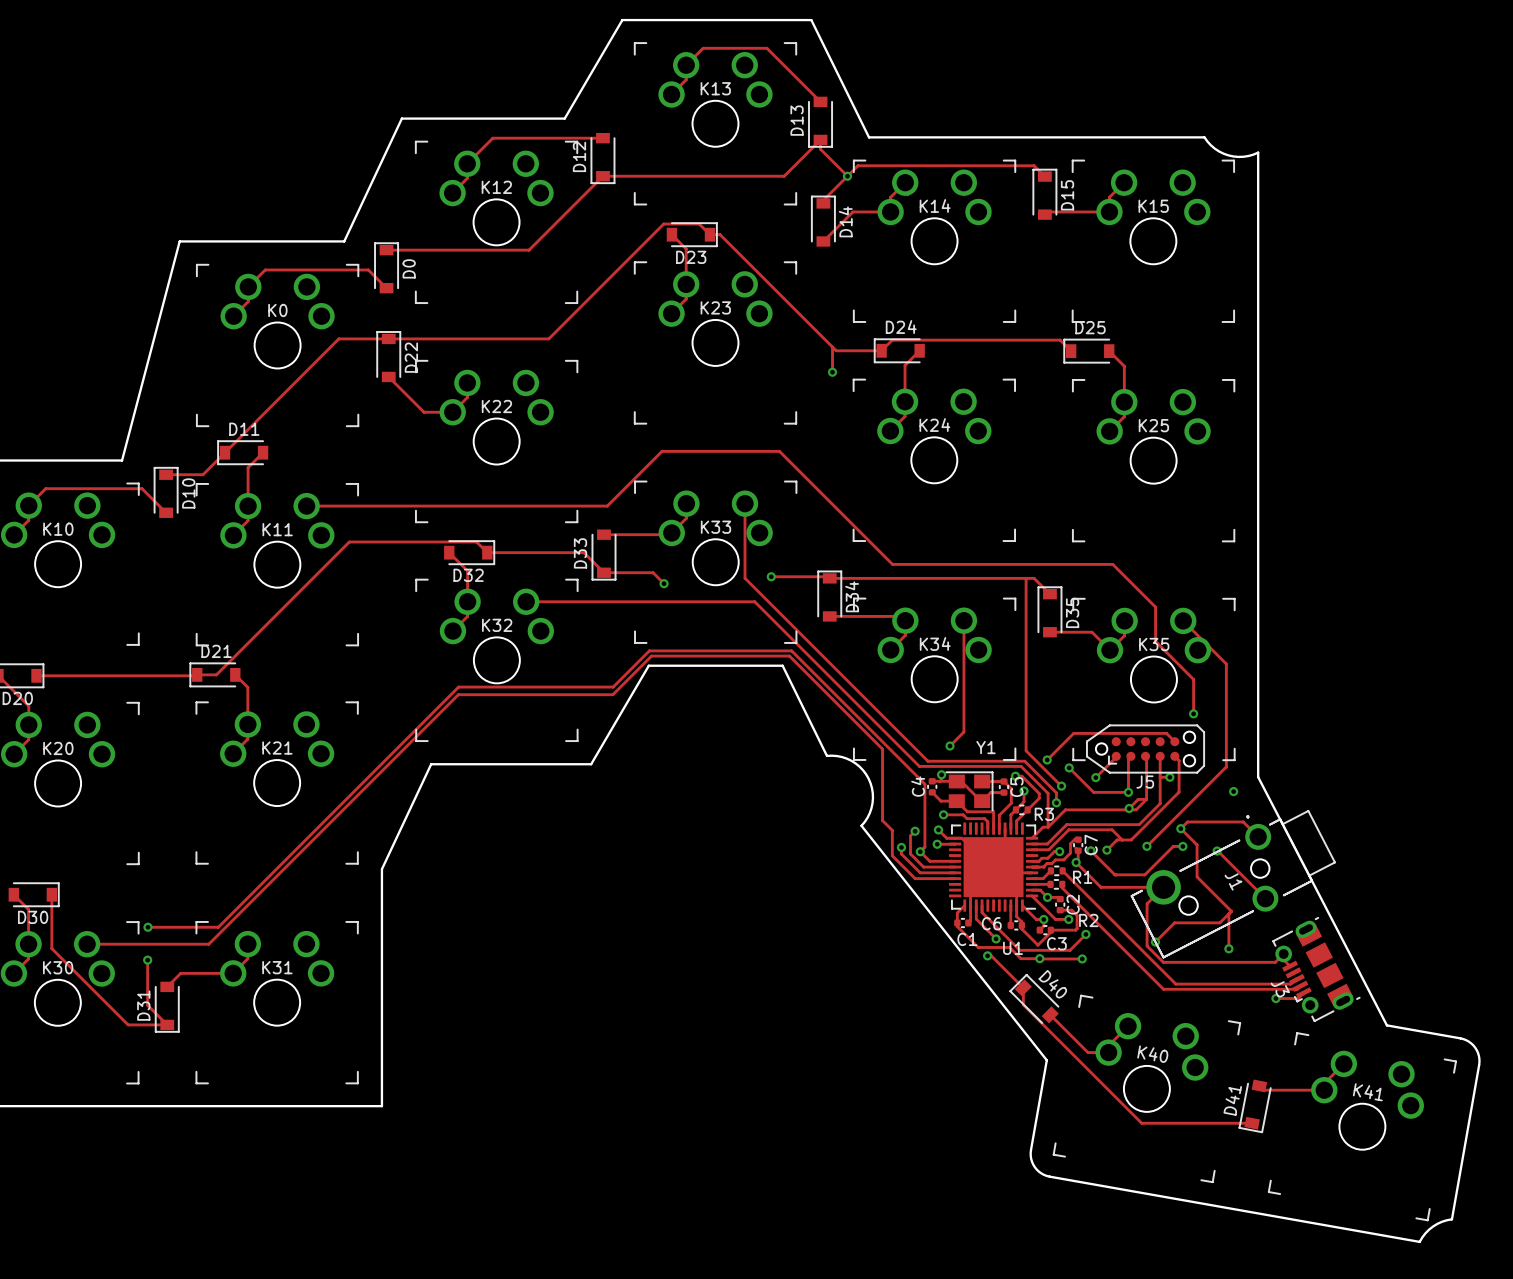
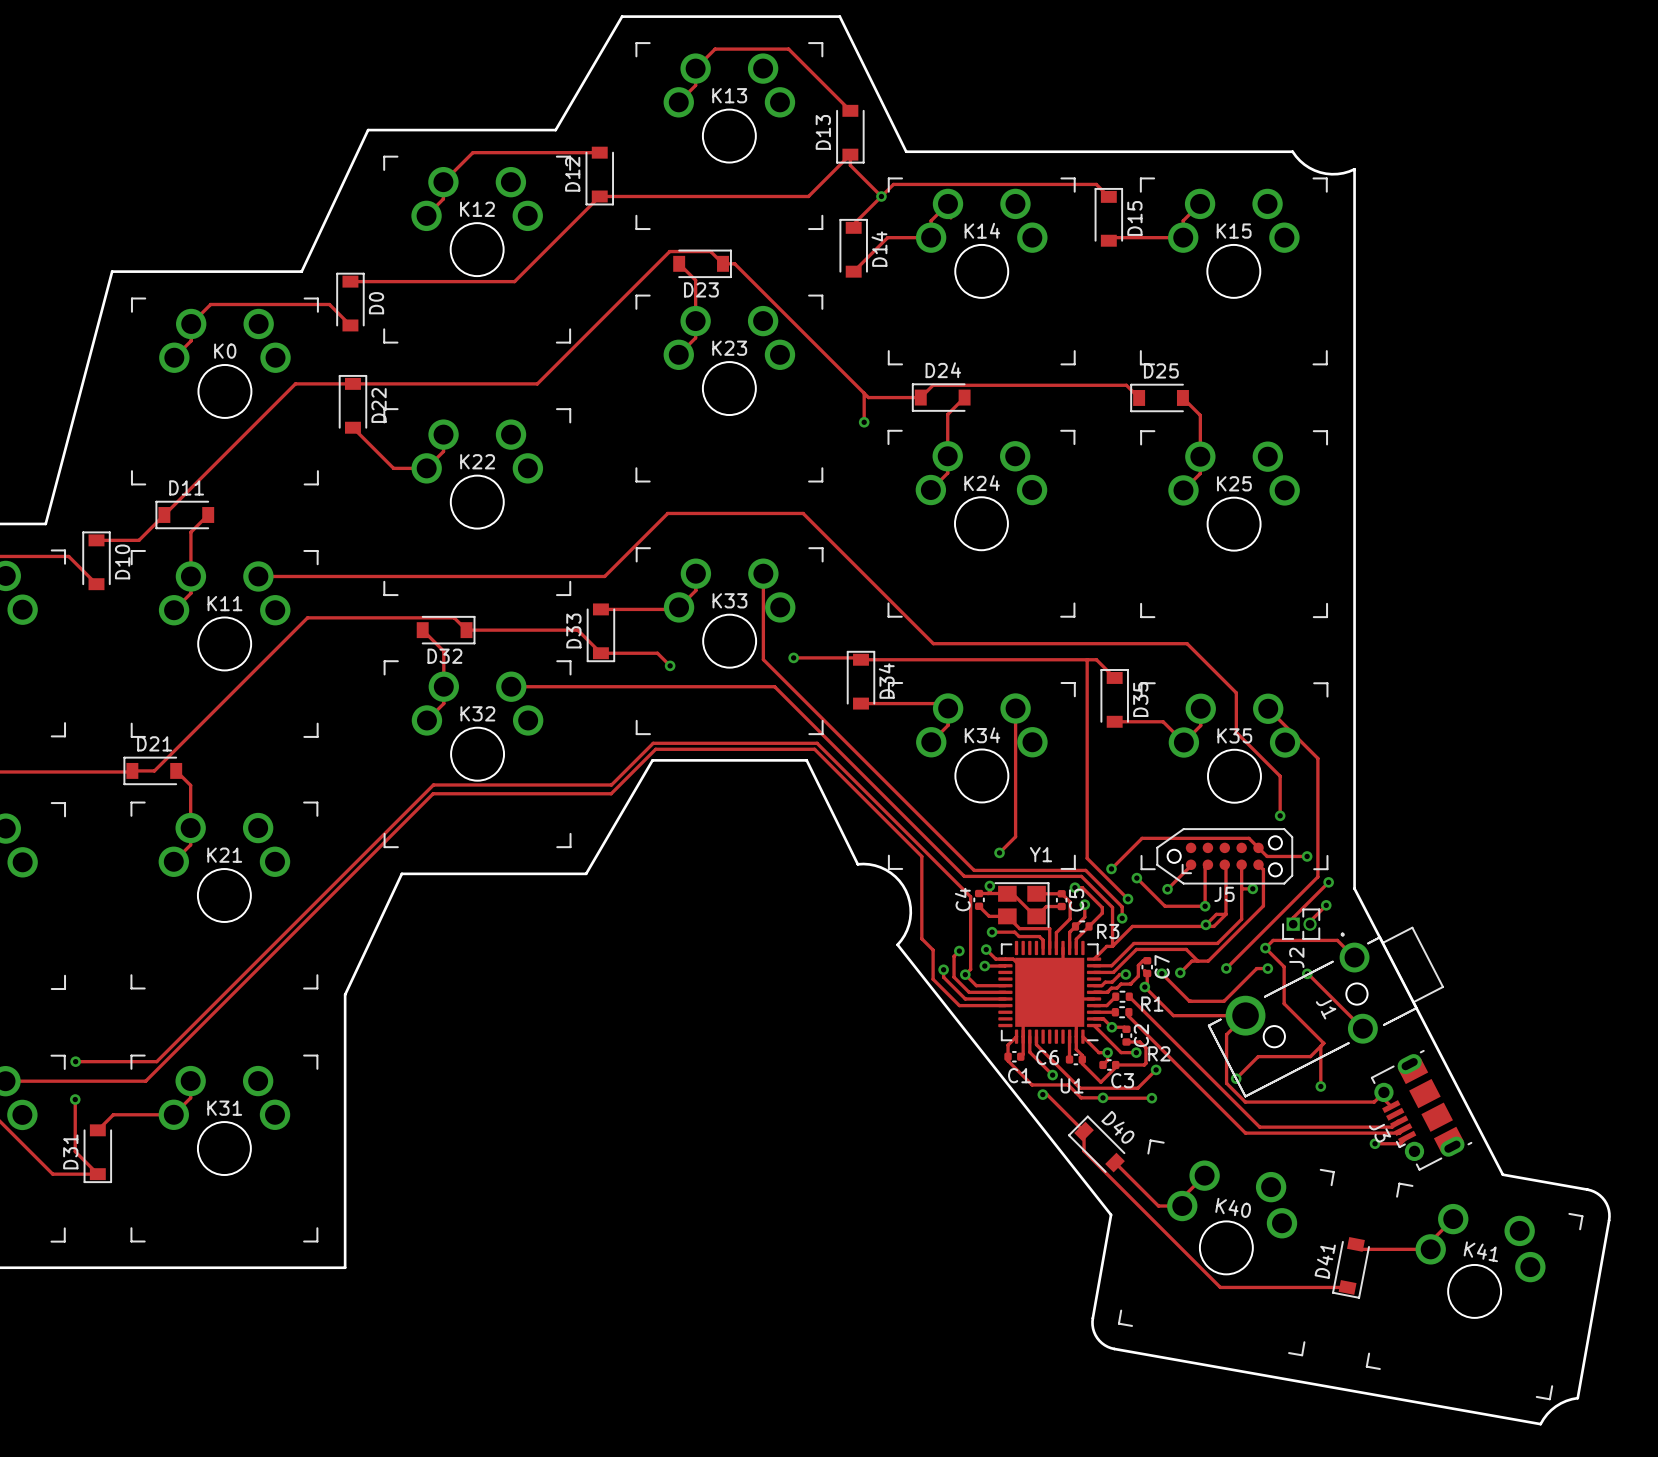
track: none -> (1258, 847) (1267, 856) (1307, 856)
via: none -> (1307, 856)
track: none -> (1328, 882) (1293, 917) (1293, 924)
via: none -> (1328, 882)
track: none -> (1326, 905) (1310, 921) (1310, 924)
J2: none -> (1301, 924)

